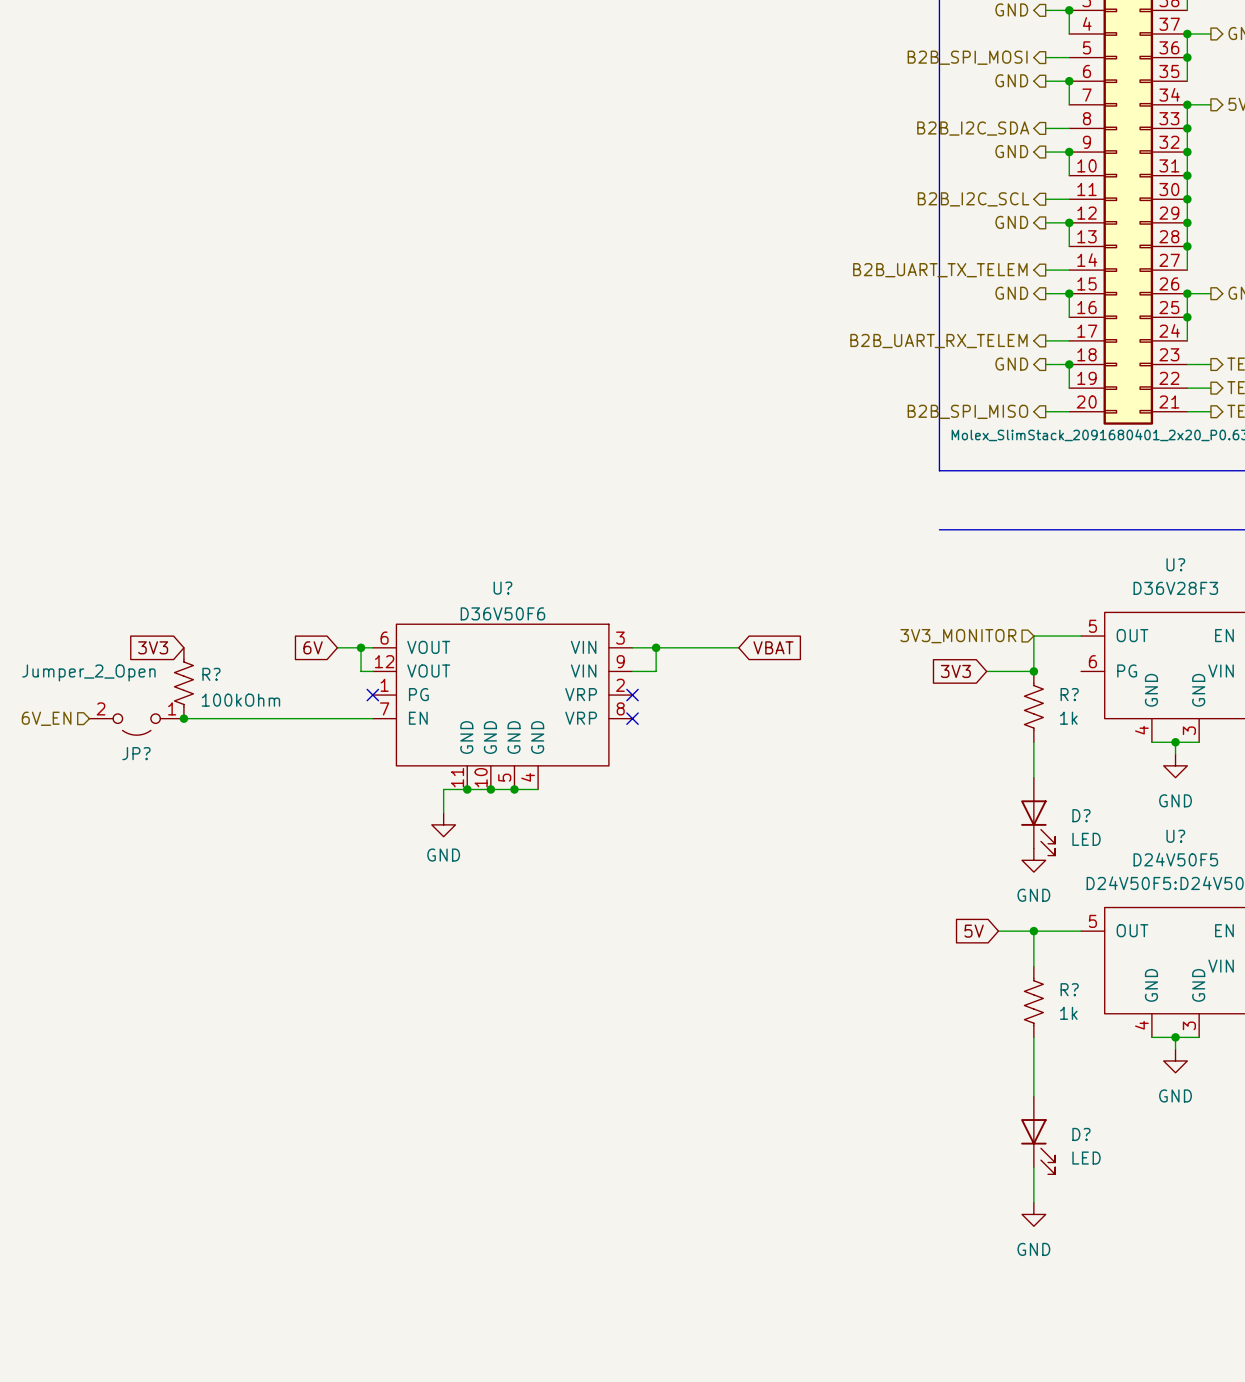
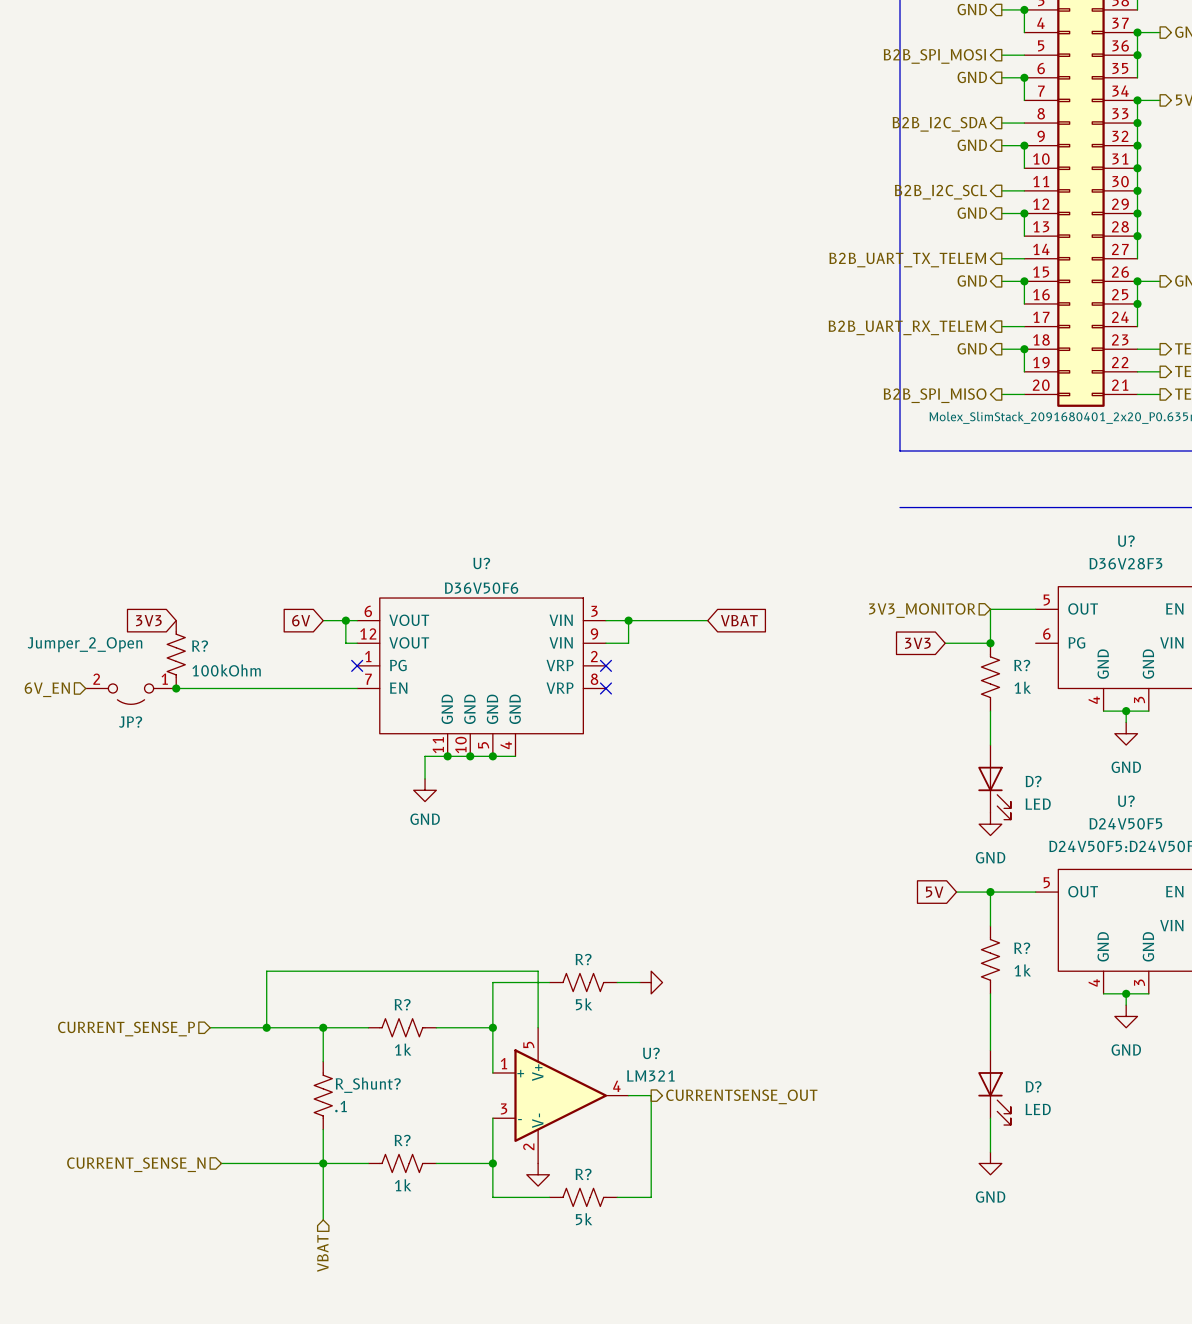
wire: none -> (549, 982) (492, 982) (492, 1072)
R?: none -> 5k (583, 982)
wire: none -> (617, 982) (639, 982)
power symbol: none -> (651, 982)
hierarchical label: none -> CURRENT_SENSE_P (126, 1029)
wire: none -> (210, 1027) (368, 1027)
wire: none -> (266, 1027) (266, 971) (538, 971) (538, 1027)
junction: none -> (266, 1027)
wire: none -> (323, 1027) (323, 1061)
junction: none -> (323, 1027)
R?: none -> 1k (402, 1027)
wire: none -> (436, 1027) (492, 1027)
junction: none -> (492, 1027)
R_Shunt?: none -> .1 (323, 1095)
U?: none -> LM321 (560, 1095)
wire: none -> (628, 1095) (651, 1095) (651, 1197) (617, 1197)
hierarchical label: none -> CURRENTSENSE_OUT (741, 1096)
wire: none -> (492, 1118) (492, 1197) (549, 1197)
wire: none -> (323, 1129) (323, 1220)
hierarchical label: none -> CURRENT_SENSE_N (136, 1164)
wire: none -> (221, 1163) (368, 1163)
junction: none -> (323, 1163)
R?: none -> 1k (402, 1163)
wire: none -> (436, 1163) (492, 1163)
junction: none -> (492, 1163)
power symbol: none -> (538, 1174)
R?: none -> 5k (583, 1197)
hierarchical label: none -> VBAT (322, 1253)

